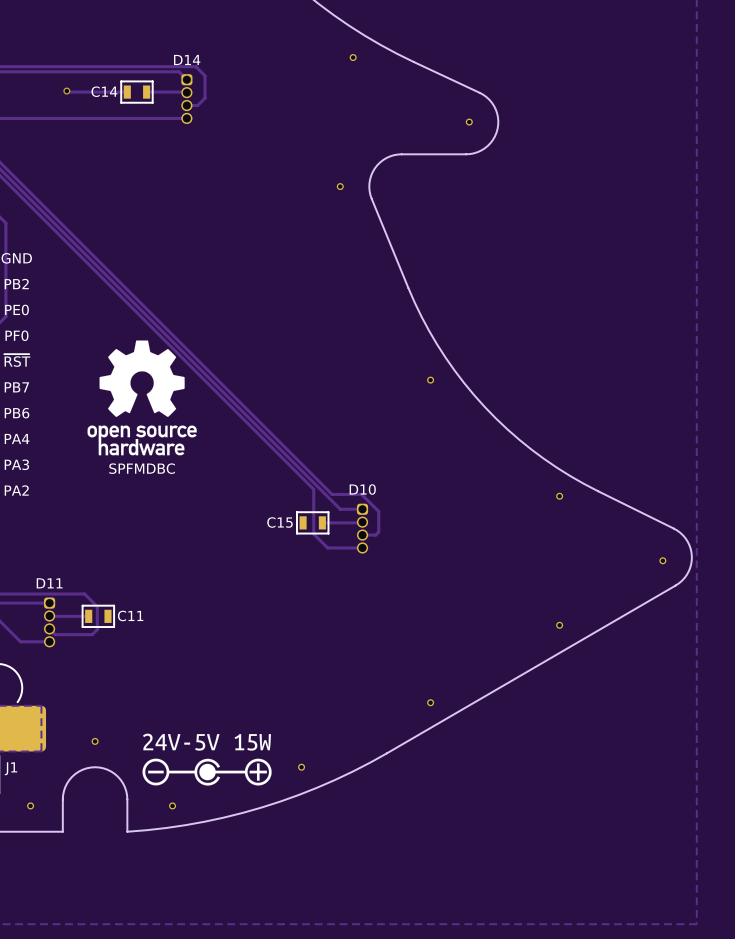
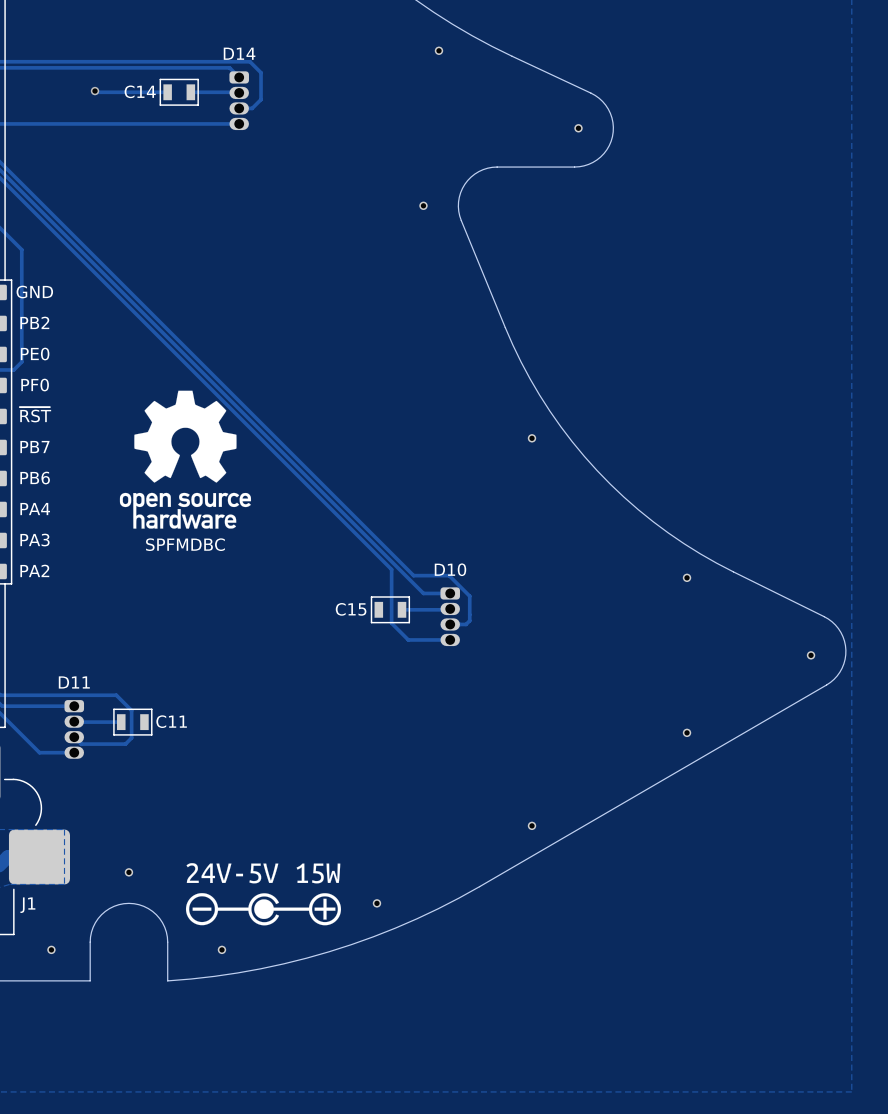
D14 footprint: [181, 74, 193, 125] -> [229, 71, 249, 131]
D10 footprint: [356, 503, 369, 554] -> [440, 587, 460, 647]
D11 footprint: [43, 597, 56, 648] -> [64, 700, 85, 759]

